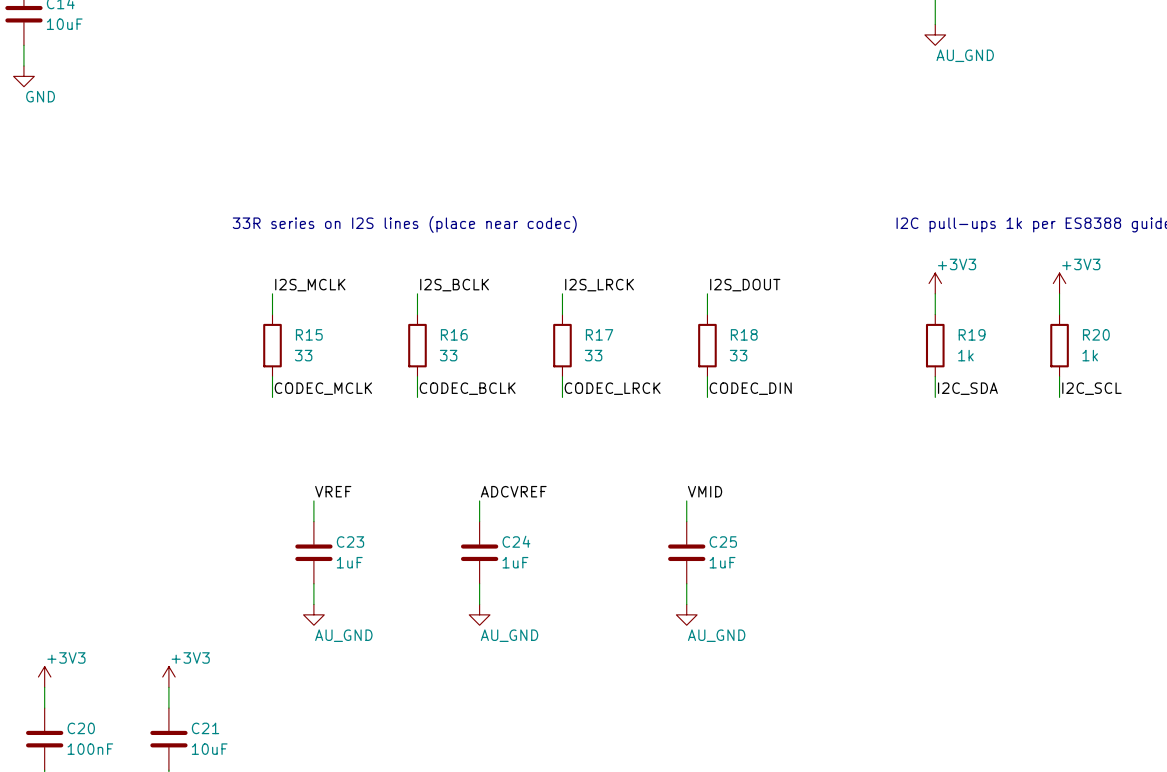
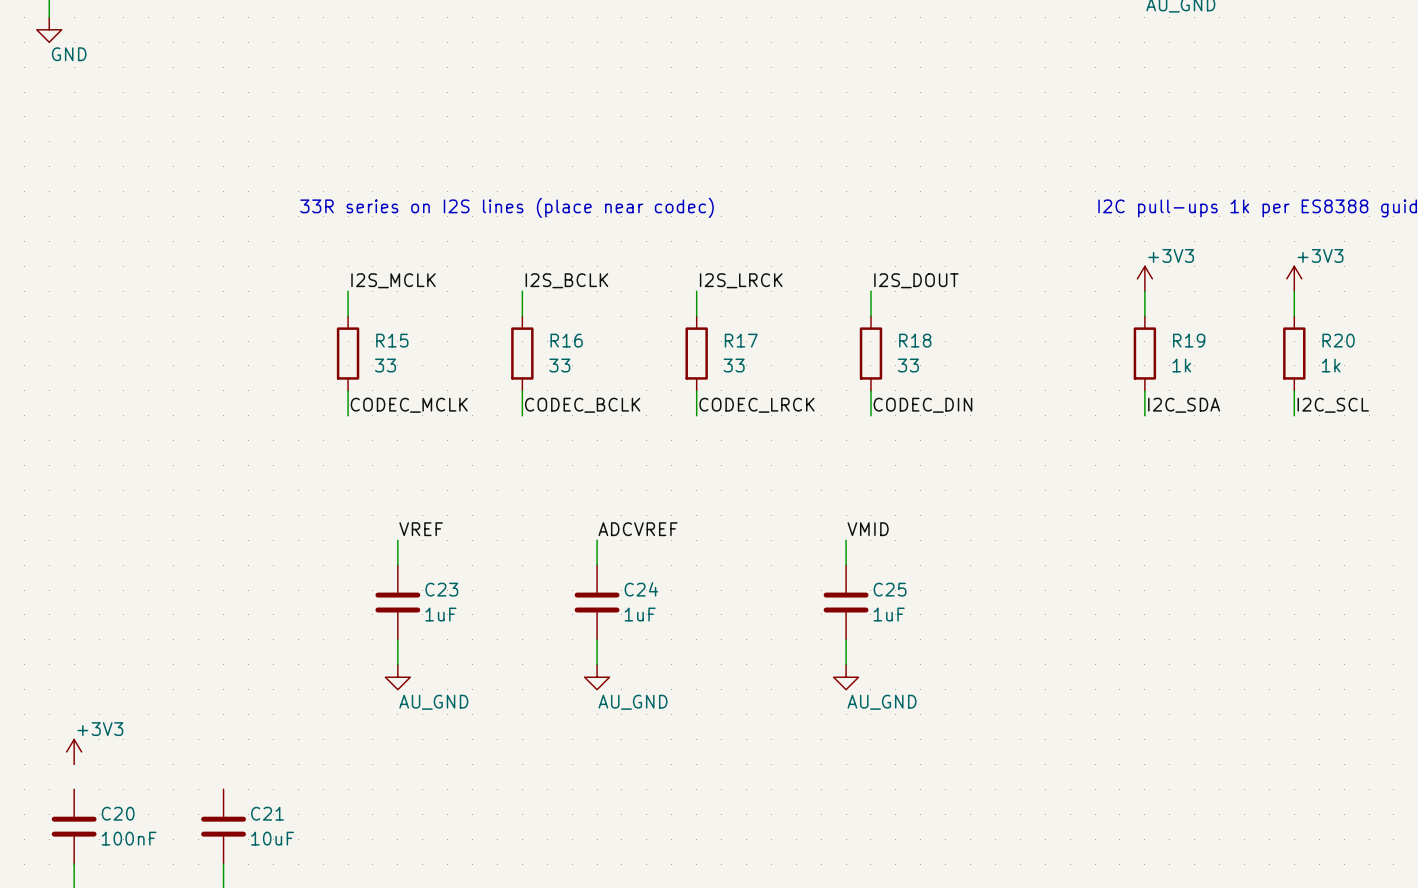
power symbol: +3V3 (168, 677) -> none
wire: (44, 687) (44, 708) -> none
wire: (168, 687) (168, 708) -> none

